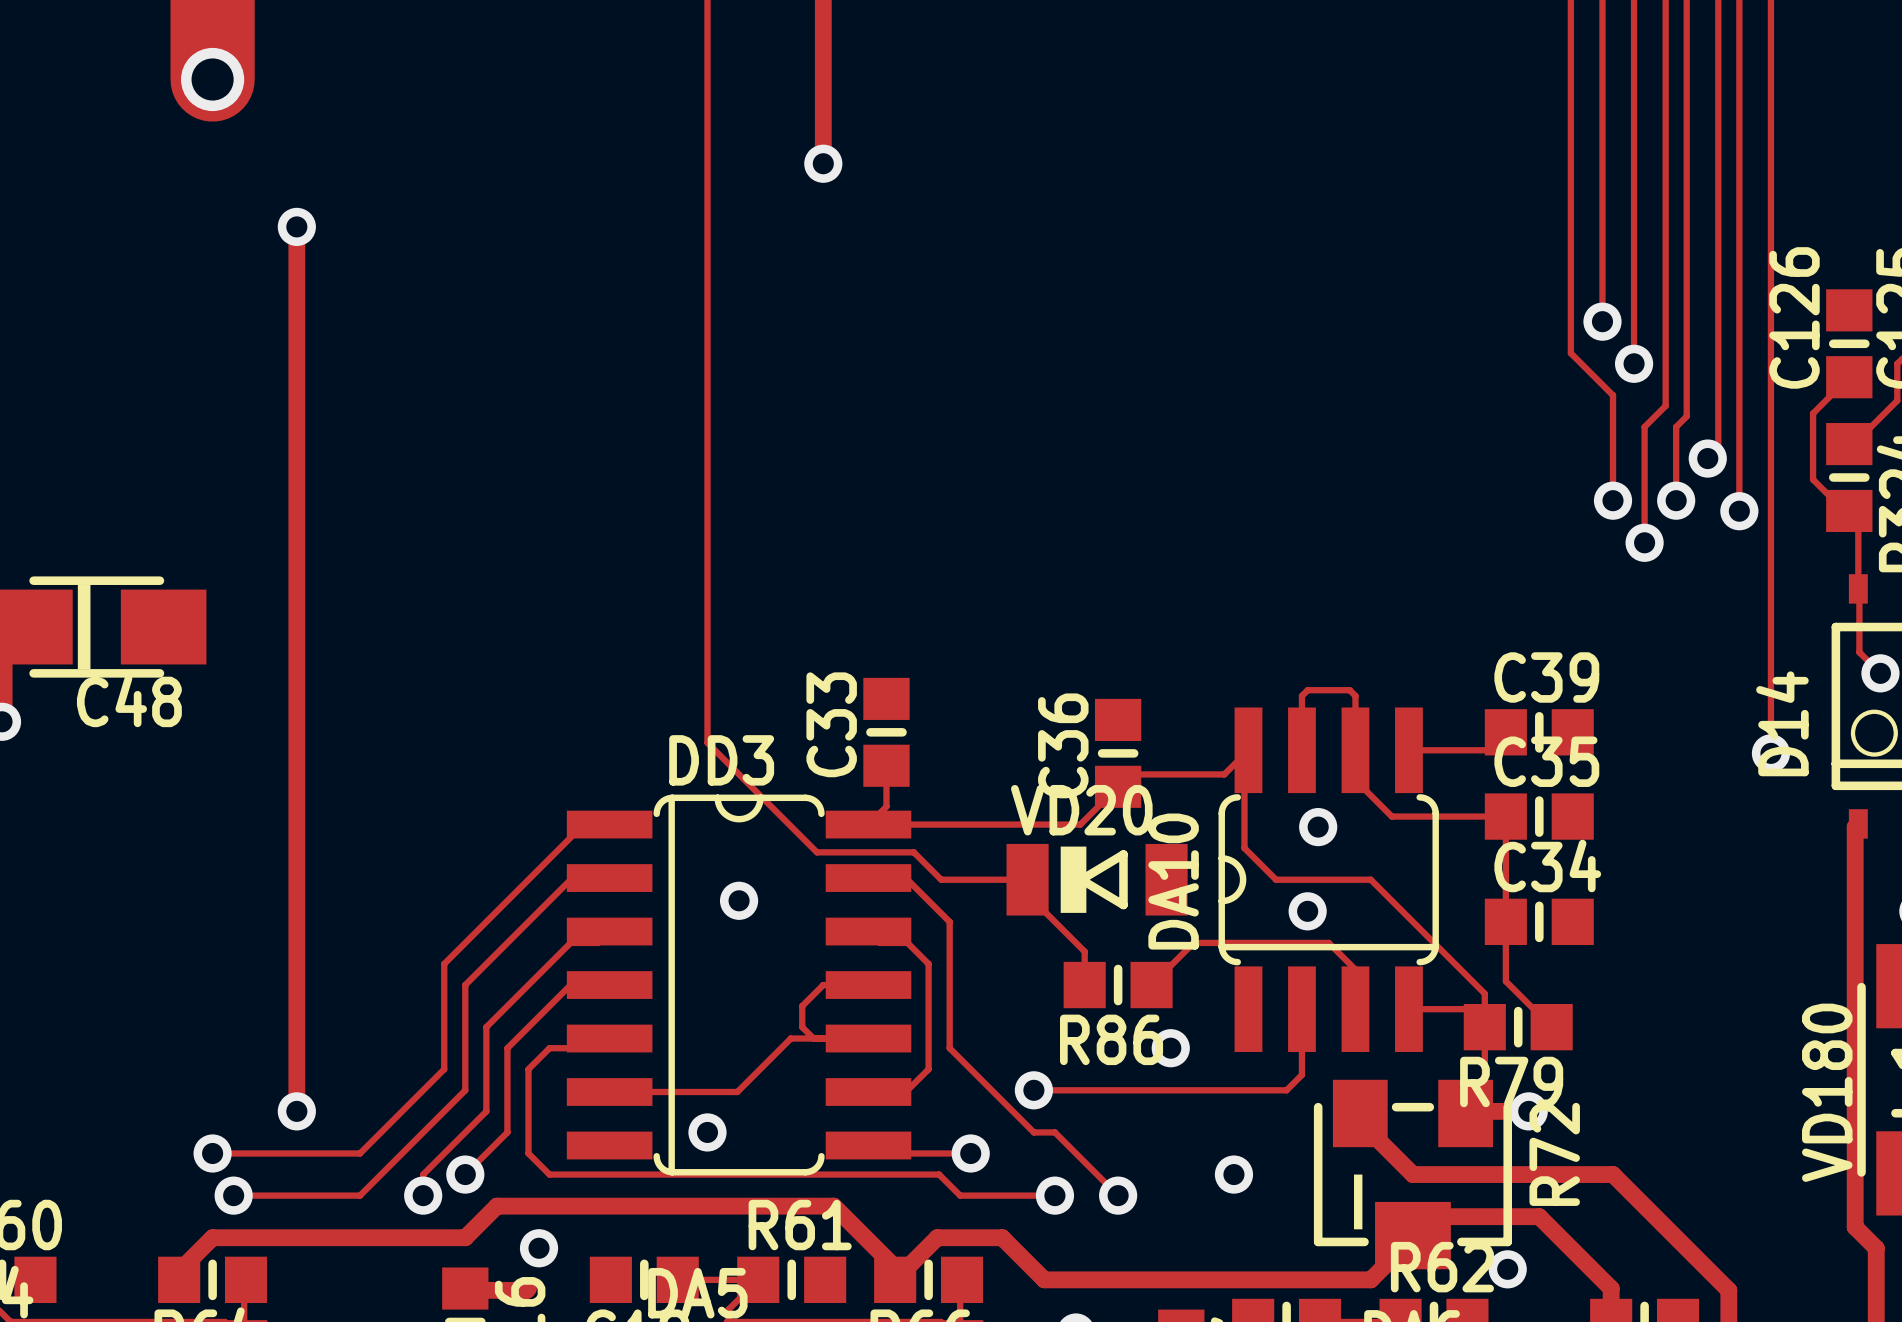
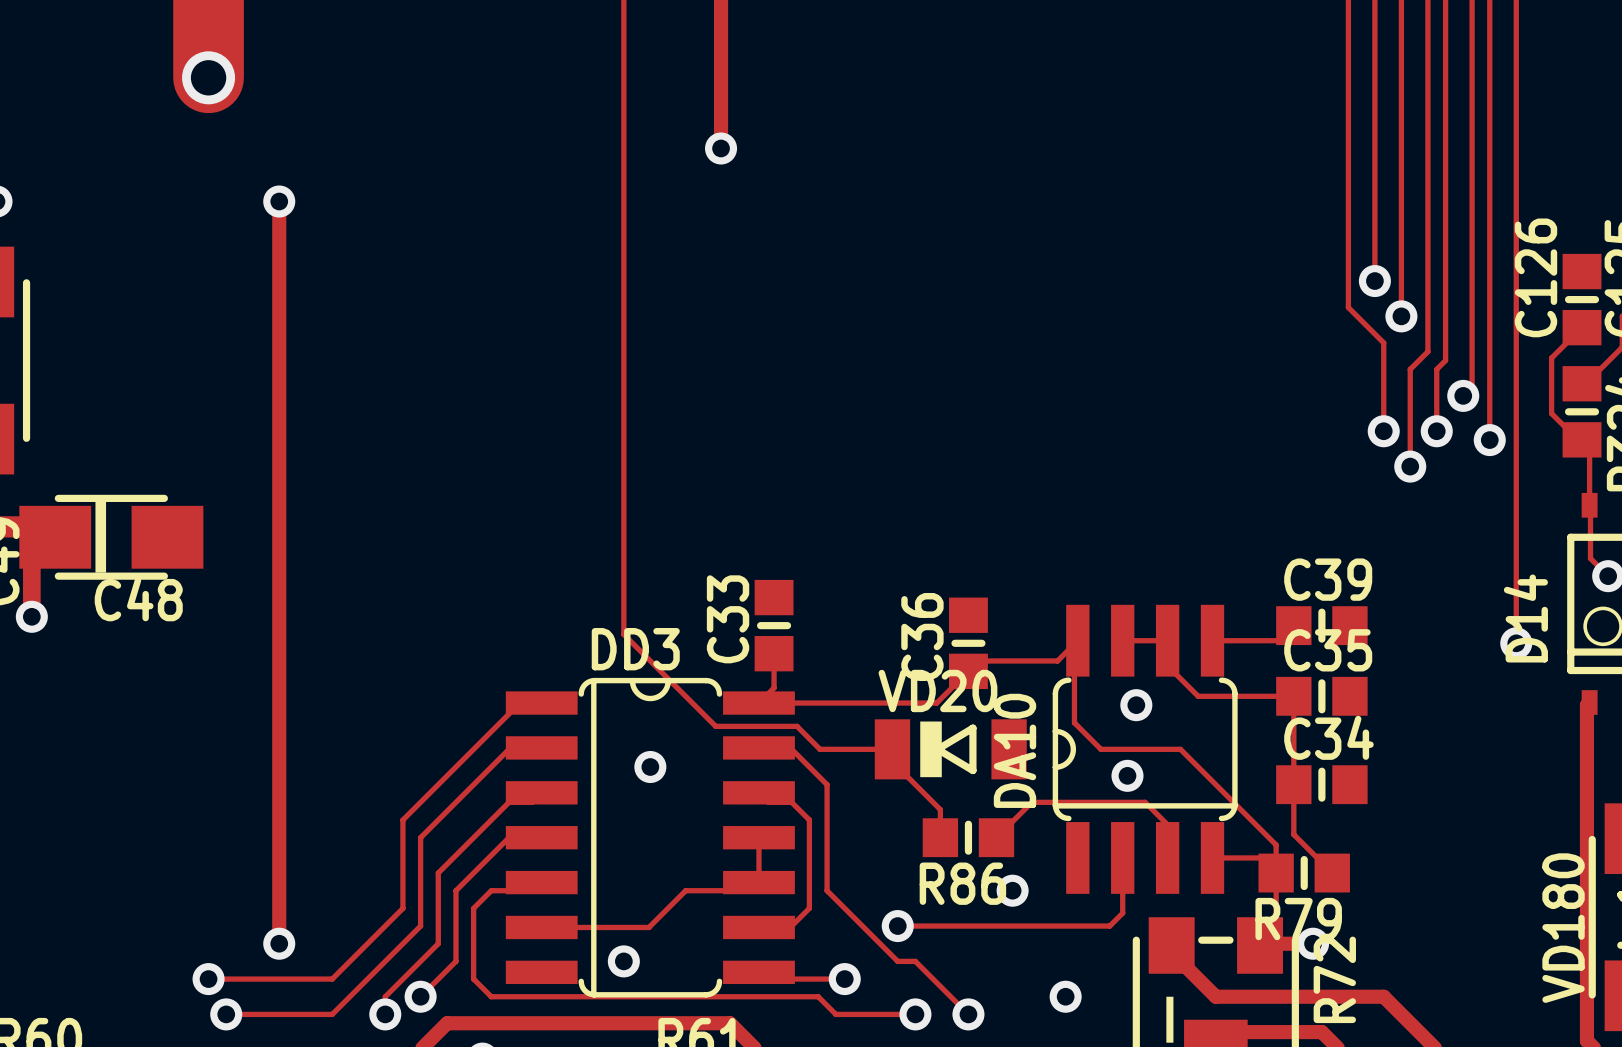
track: (1301, 750) (1301, 695) (1307, 690) (1349, 690) (1355, 695) (1355, 750) -> (1122, 640) (1167, 640)
track: (865, 985) (823, 985) (802, 1006) (802, 1027) (813, 1038) -> none
track: (868, 1038) (790, 1038) (781, 1048) -> (758, 837) (758, 882) (750, 890) (685, 890)

